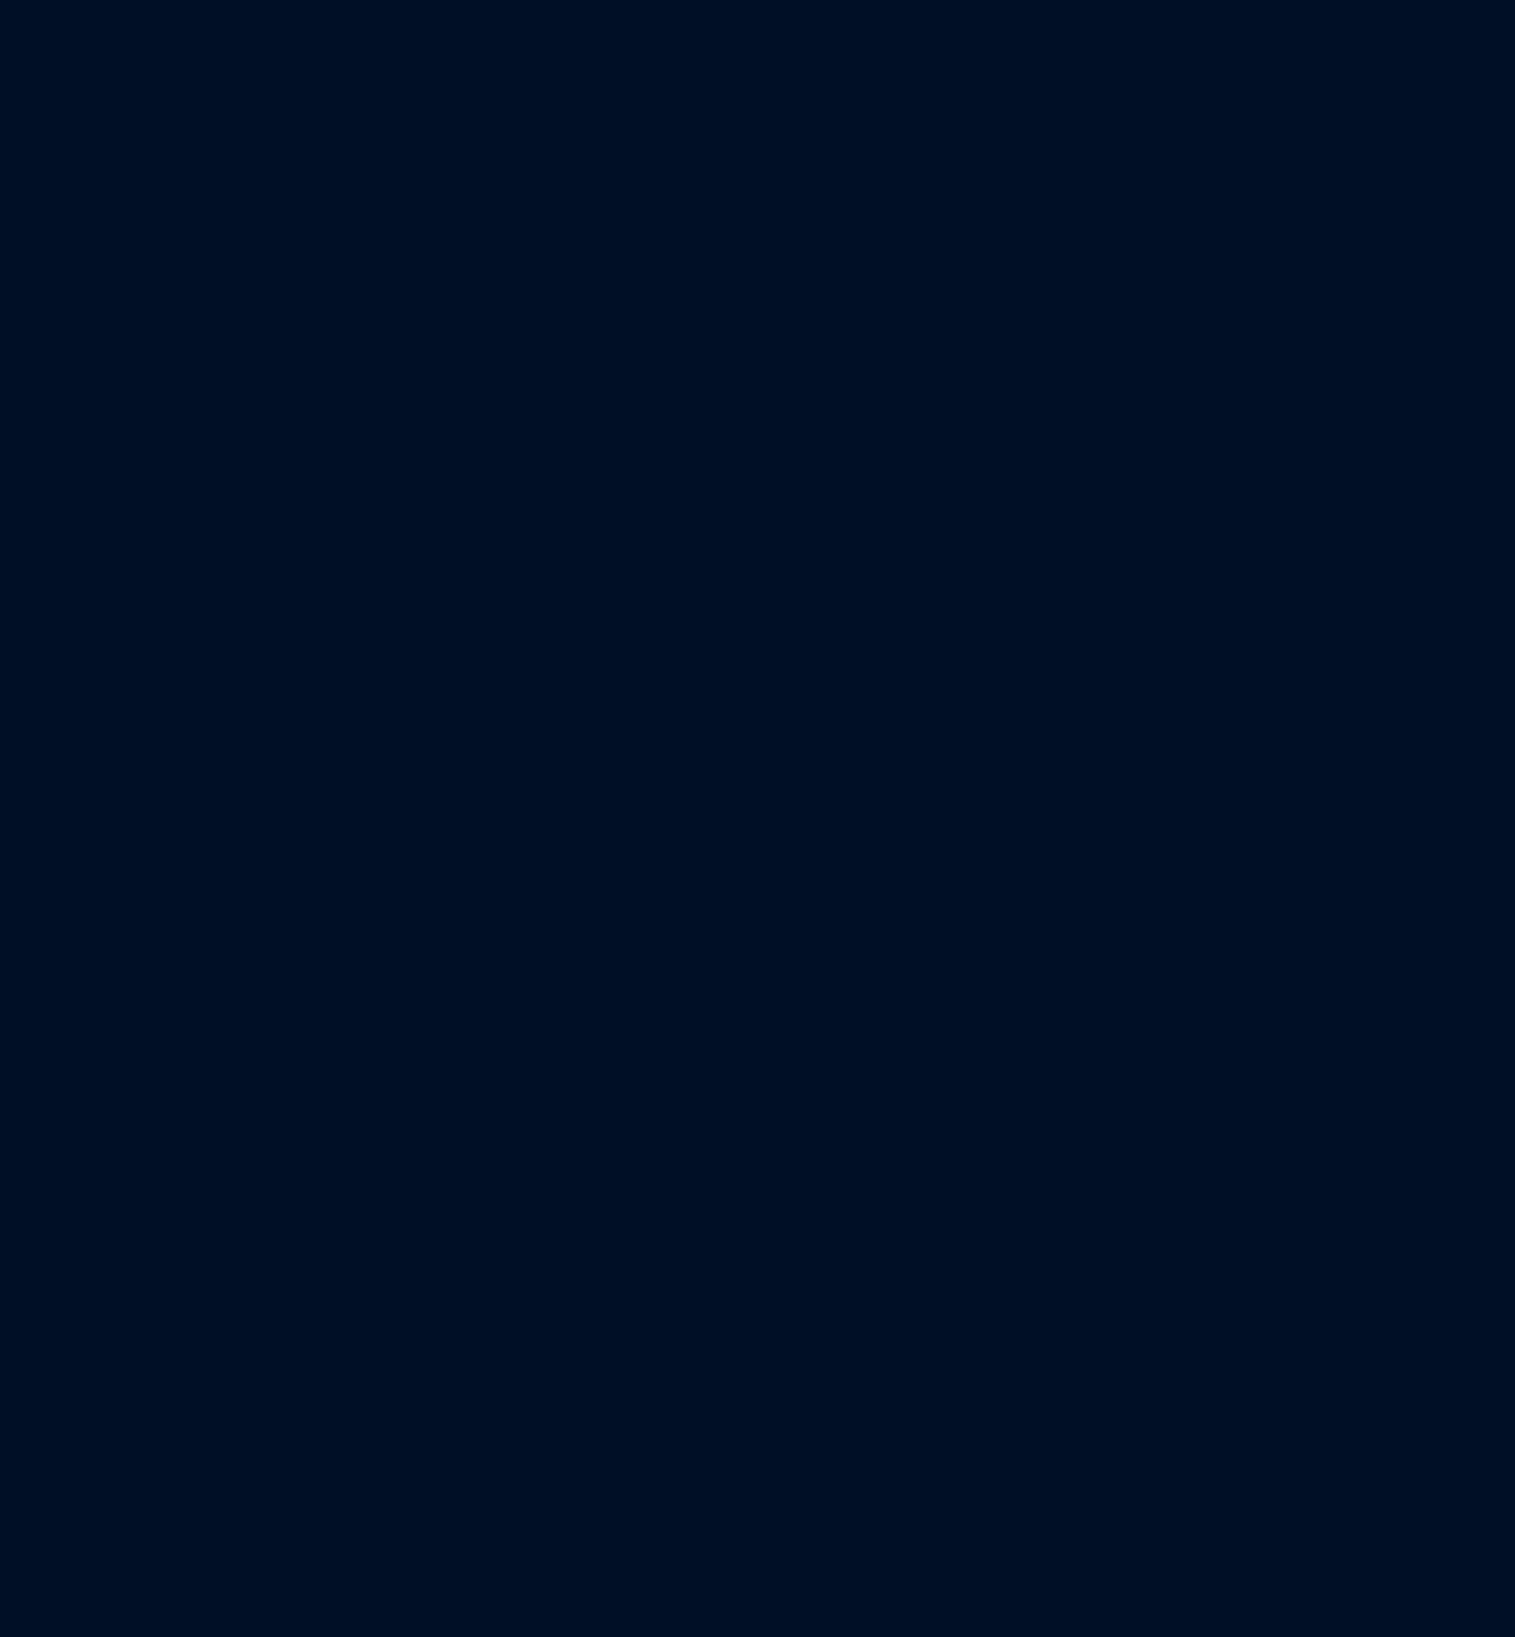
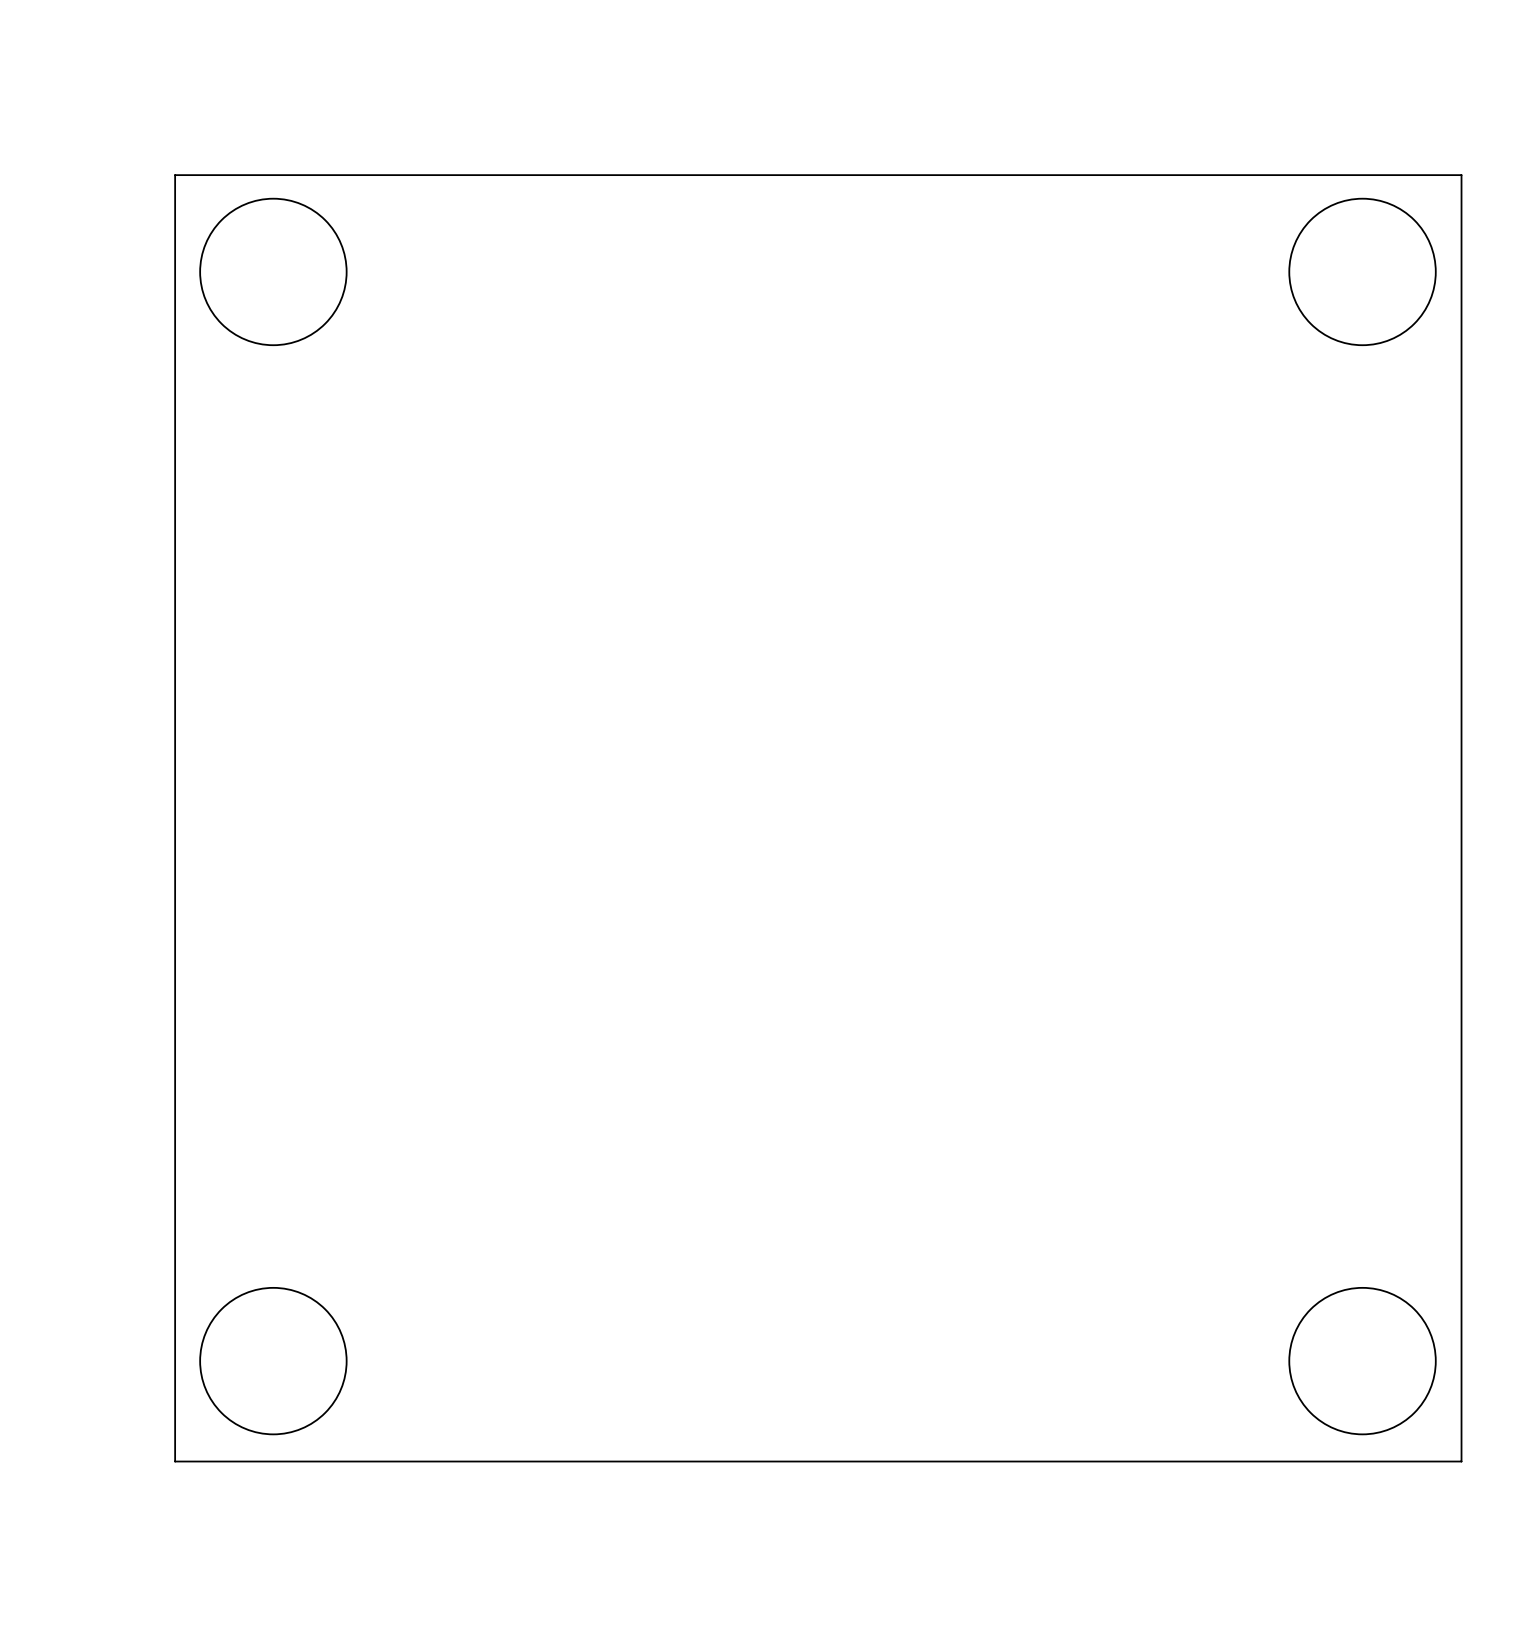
board edge: none -> (175, 175) (1461, 175) (1461, 1461) (175, 1461) (175, 175)
round board edge: none -> [199, 197, 348, 347]
round board edge: none -> [1288, 197, 1437, 347]
round board edge: none -> [199, 1286, 348, 1436]
round board edge: none -> [1288, 1286, 1437, 1436]

